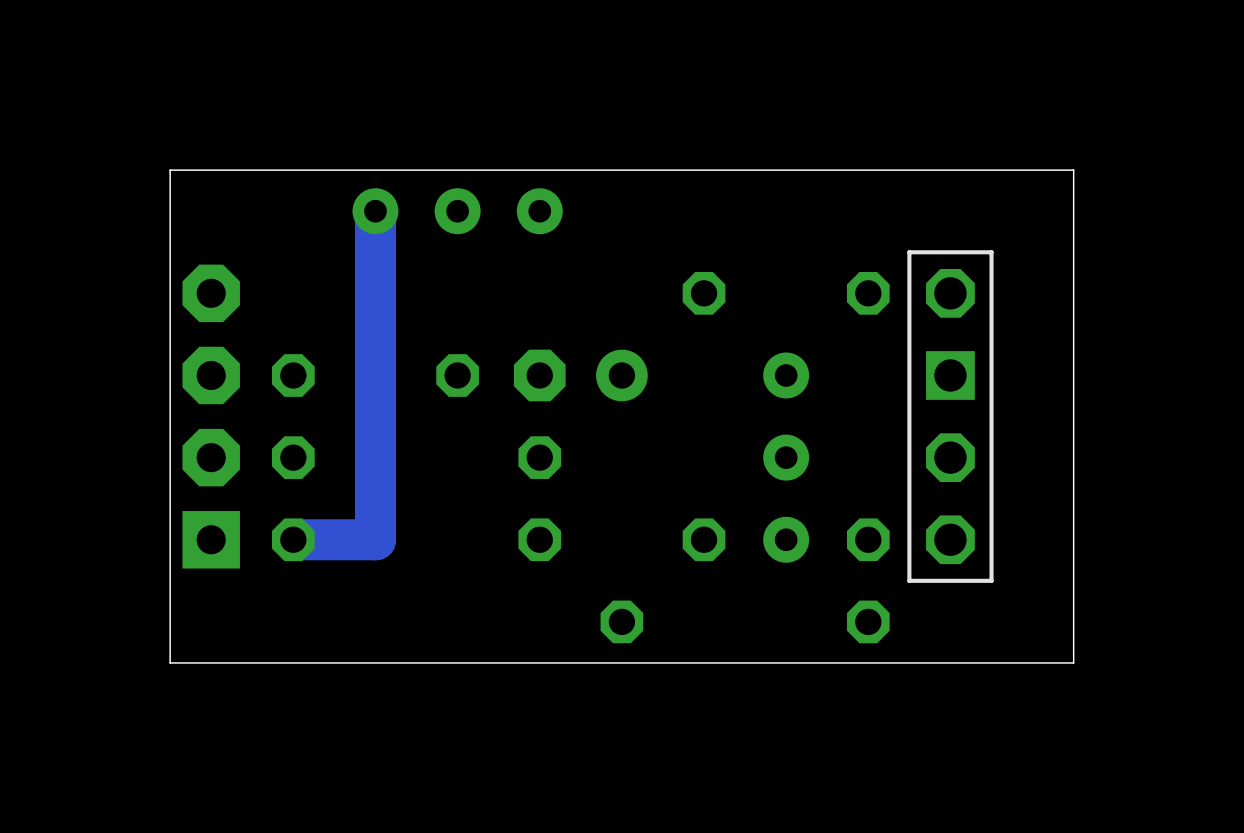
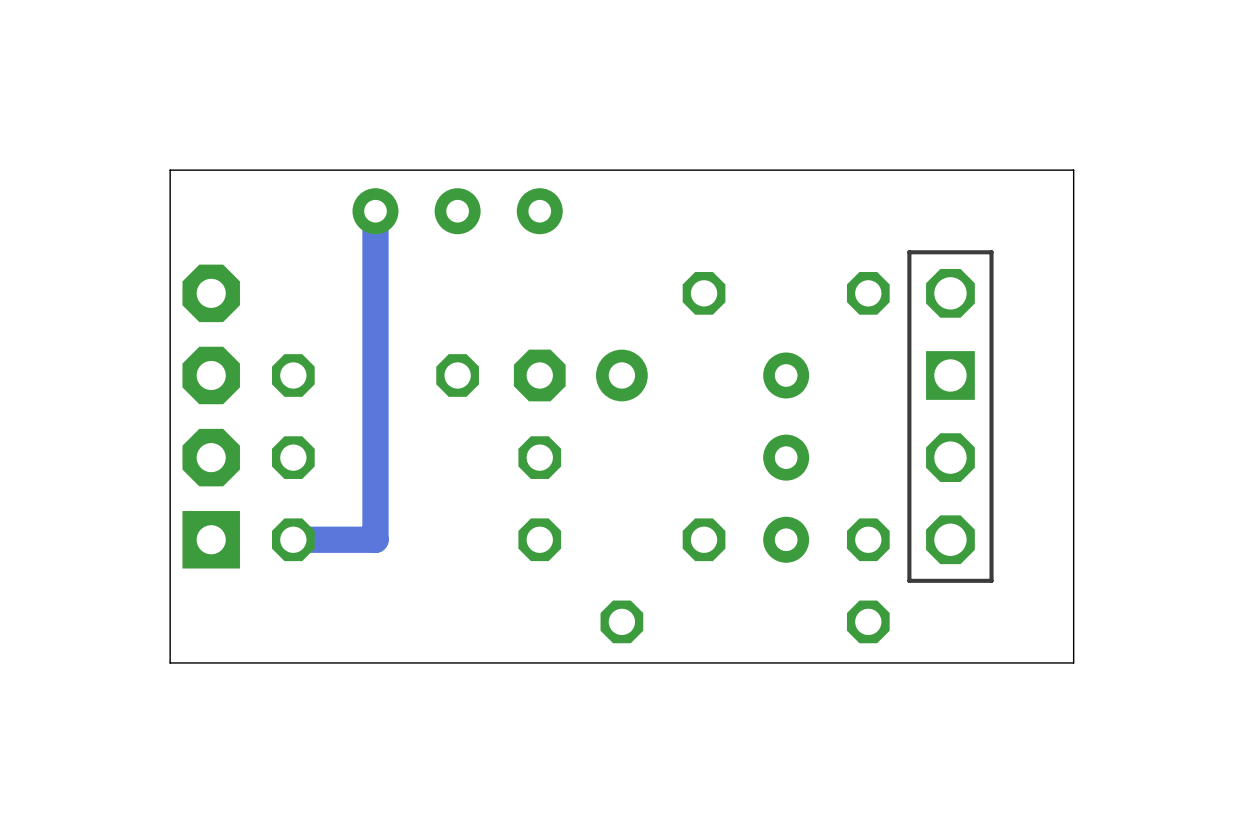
bottom track width: thick (375, 211) (375, 539) (293, 539) -> thin (375, 211) (375, 539) (293, 539)

